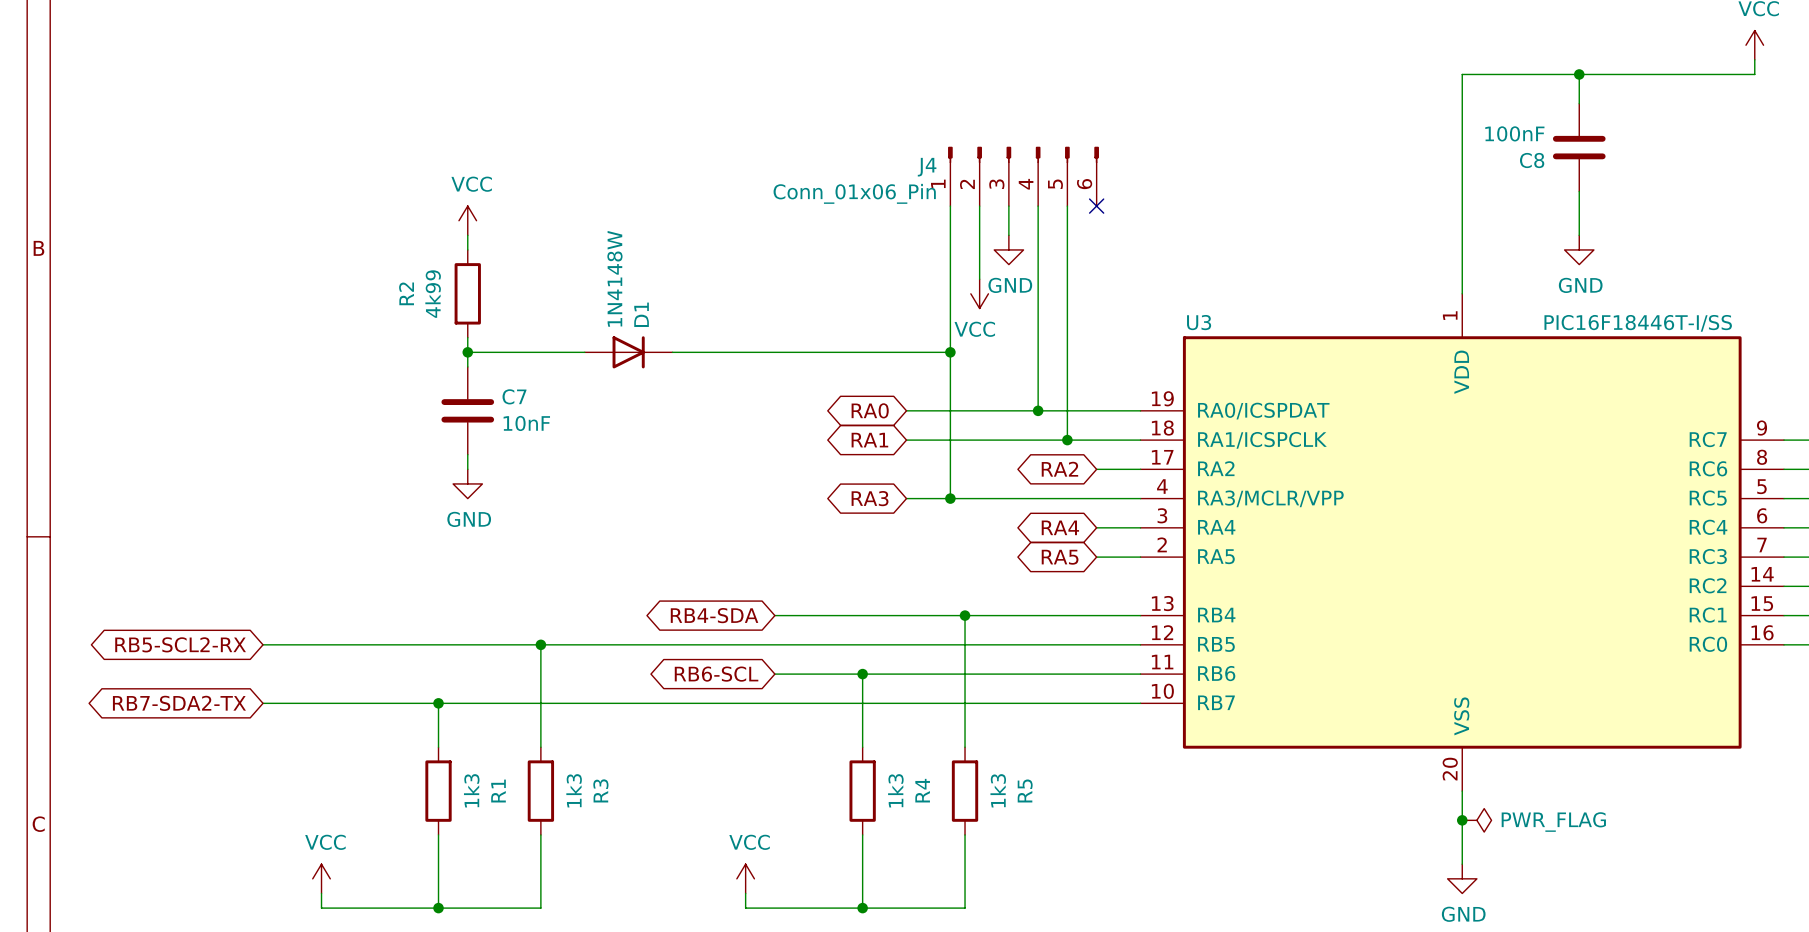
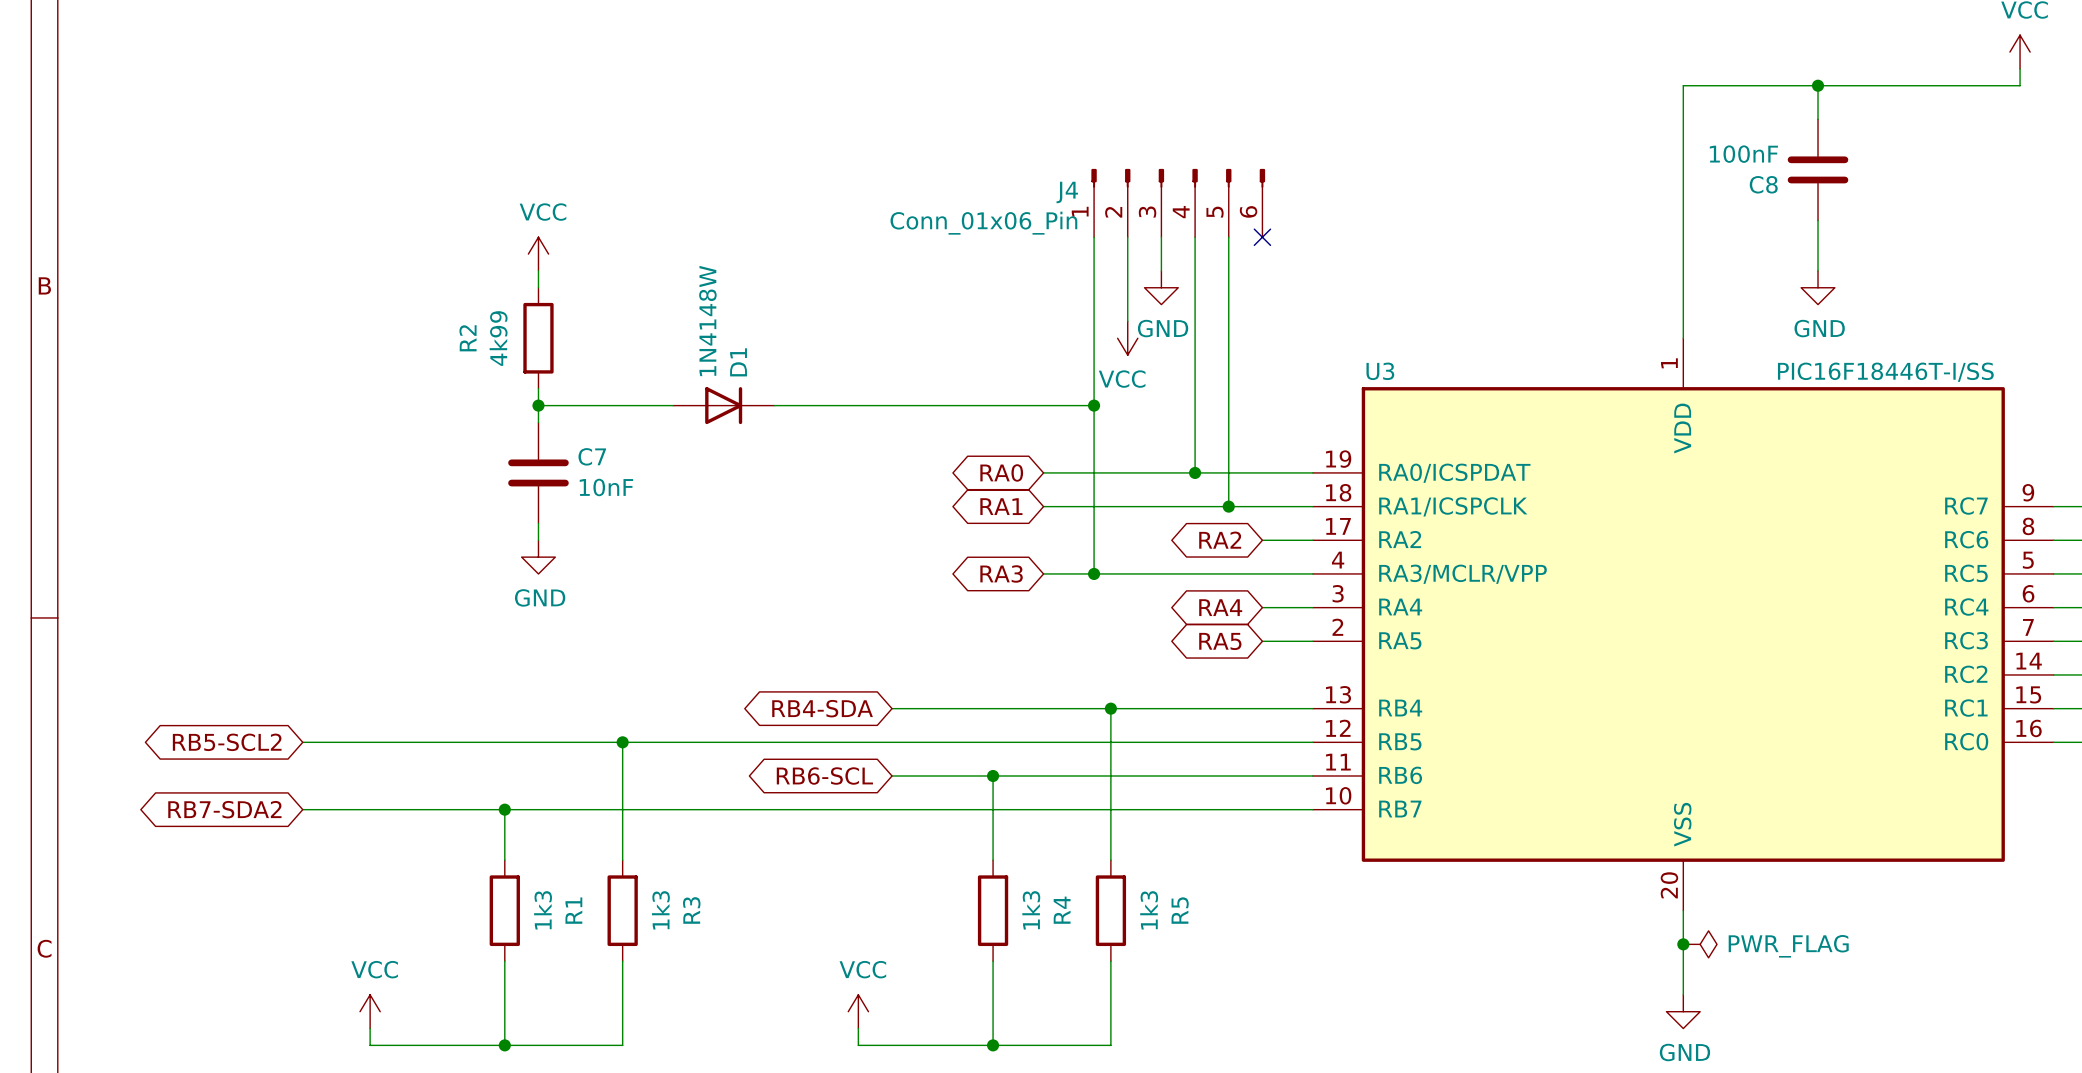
global label: RB5-SCL2-RX (180, 644) -> RB5-SCL2 (227, 742)
global label: RB7-SDA2-TX (179, 703) -> RB7-SDA2 (224, 809)

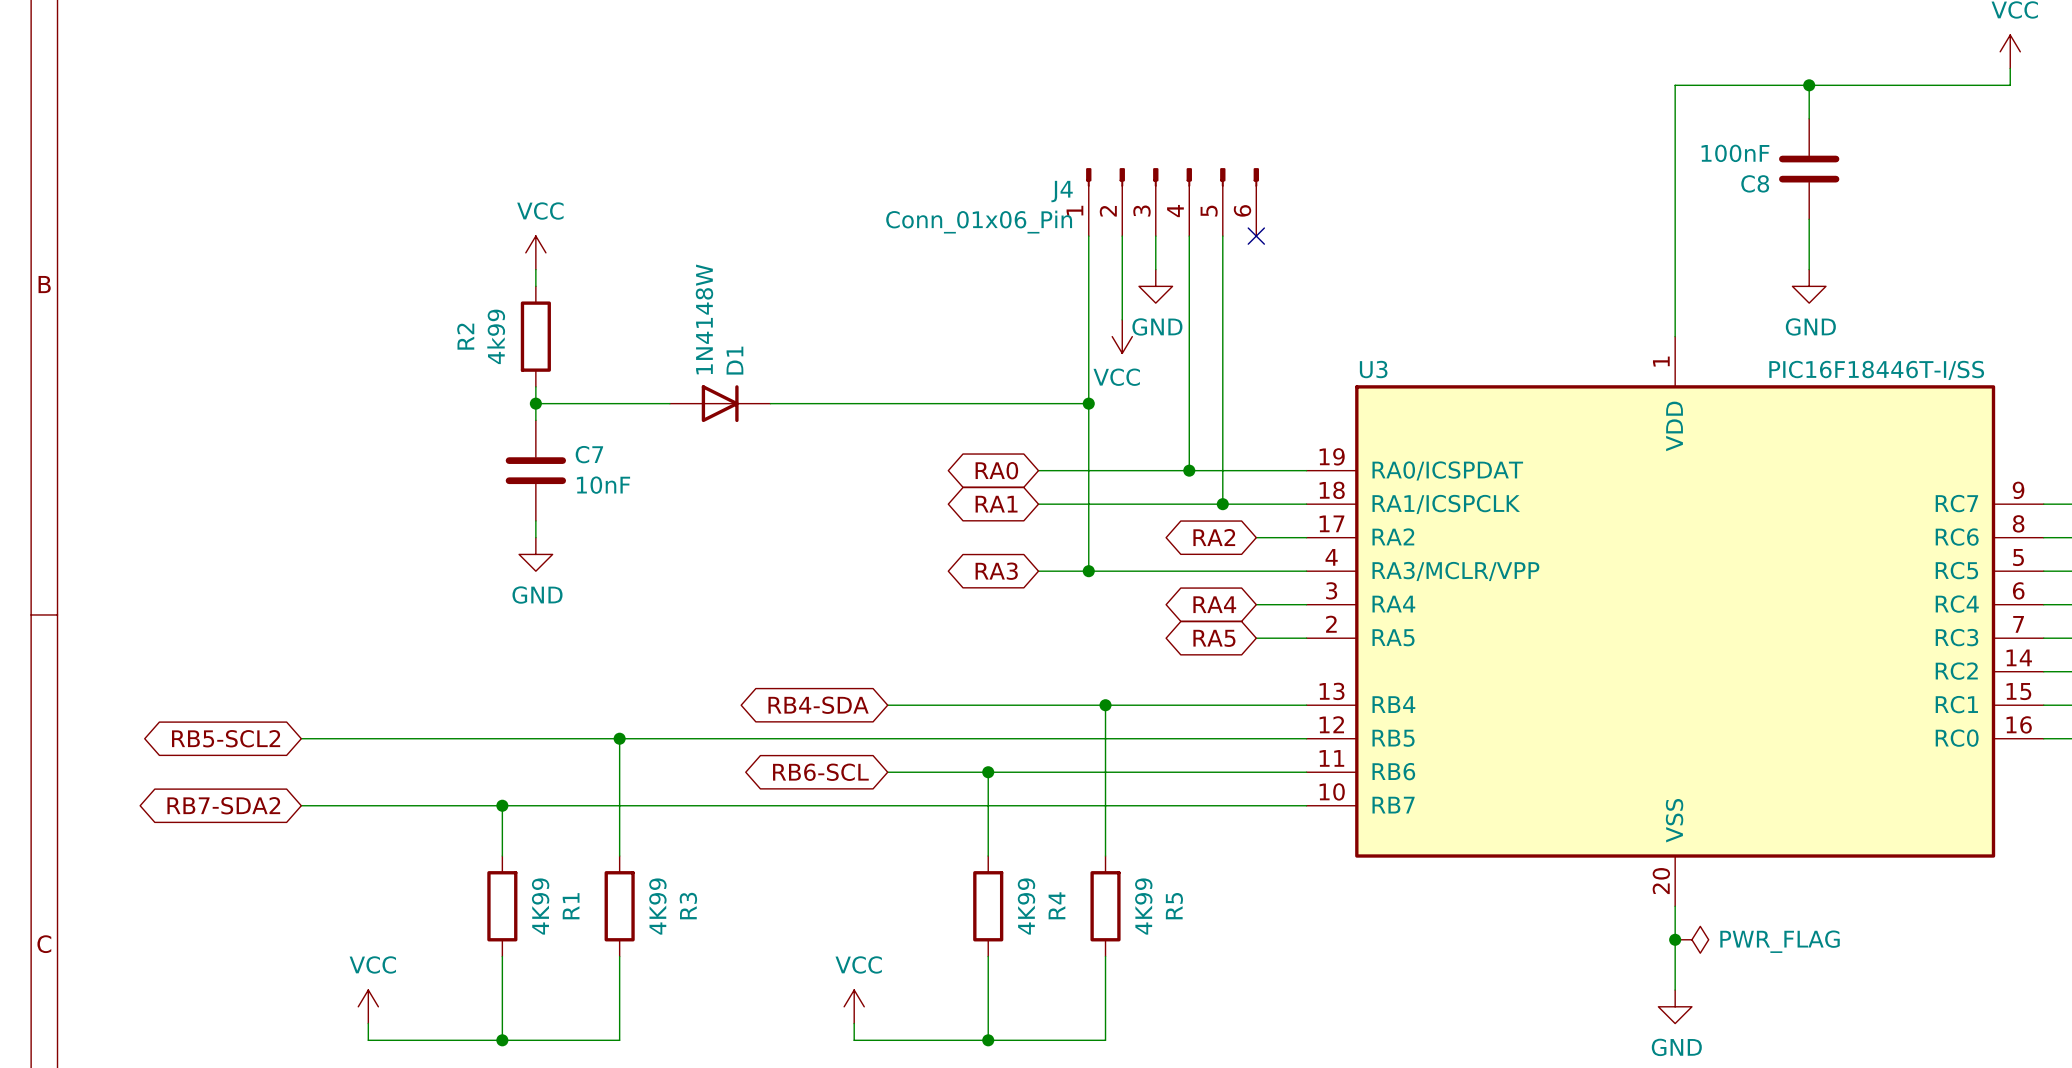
R1 value: 1k3 (543, 910) -> 4K99 (540, 906)
R3 value: 1k3 (660, 910) -> 4K99 (657, 906)
R4 value: 1k3 (1031, 910) -> 4K99 (1026, 906)
R5 value: 1k3 (1149, 910) -> 4K99 (1143, 906)

